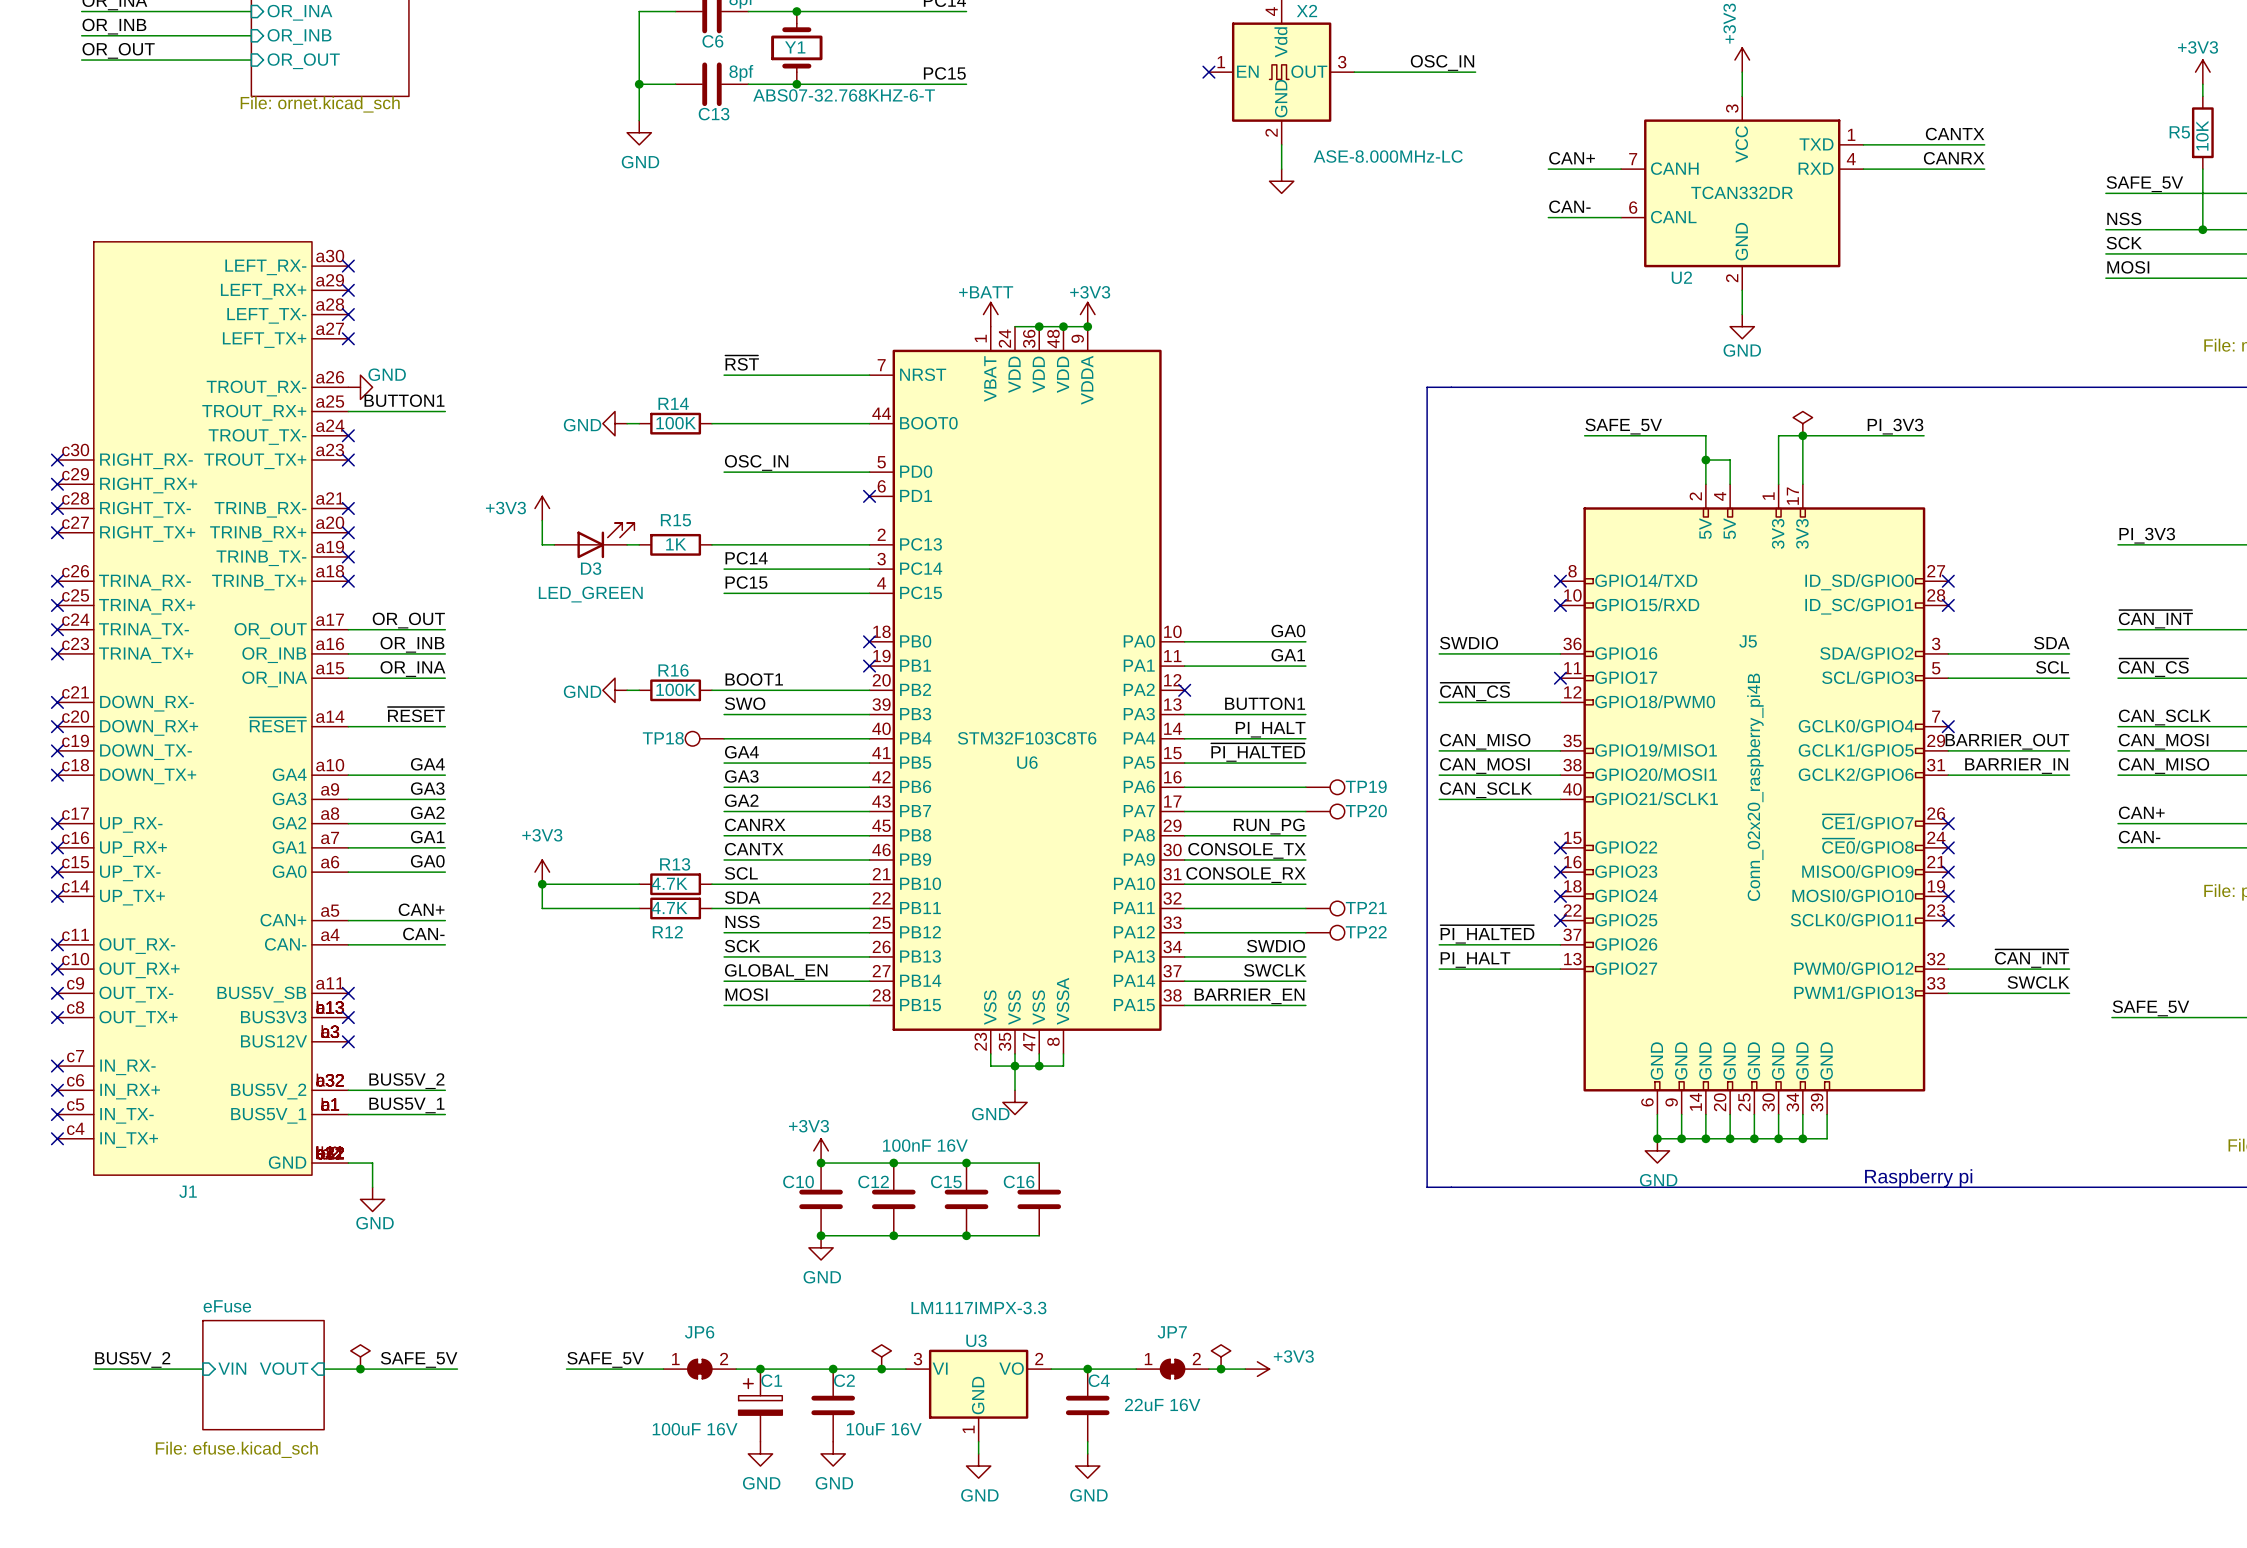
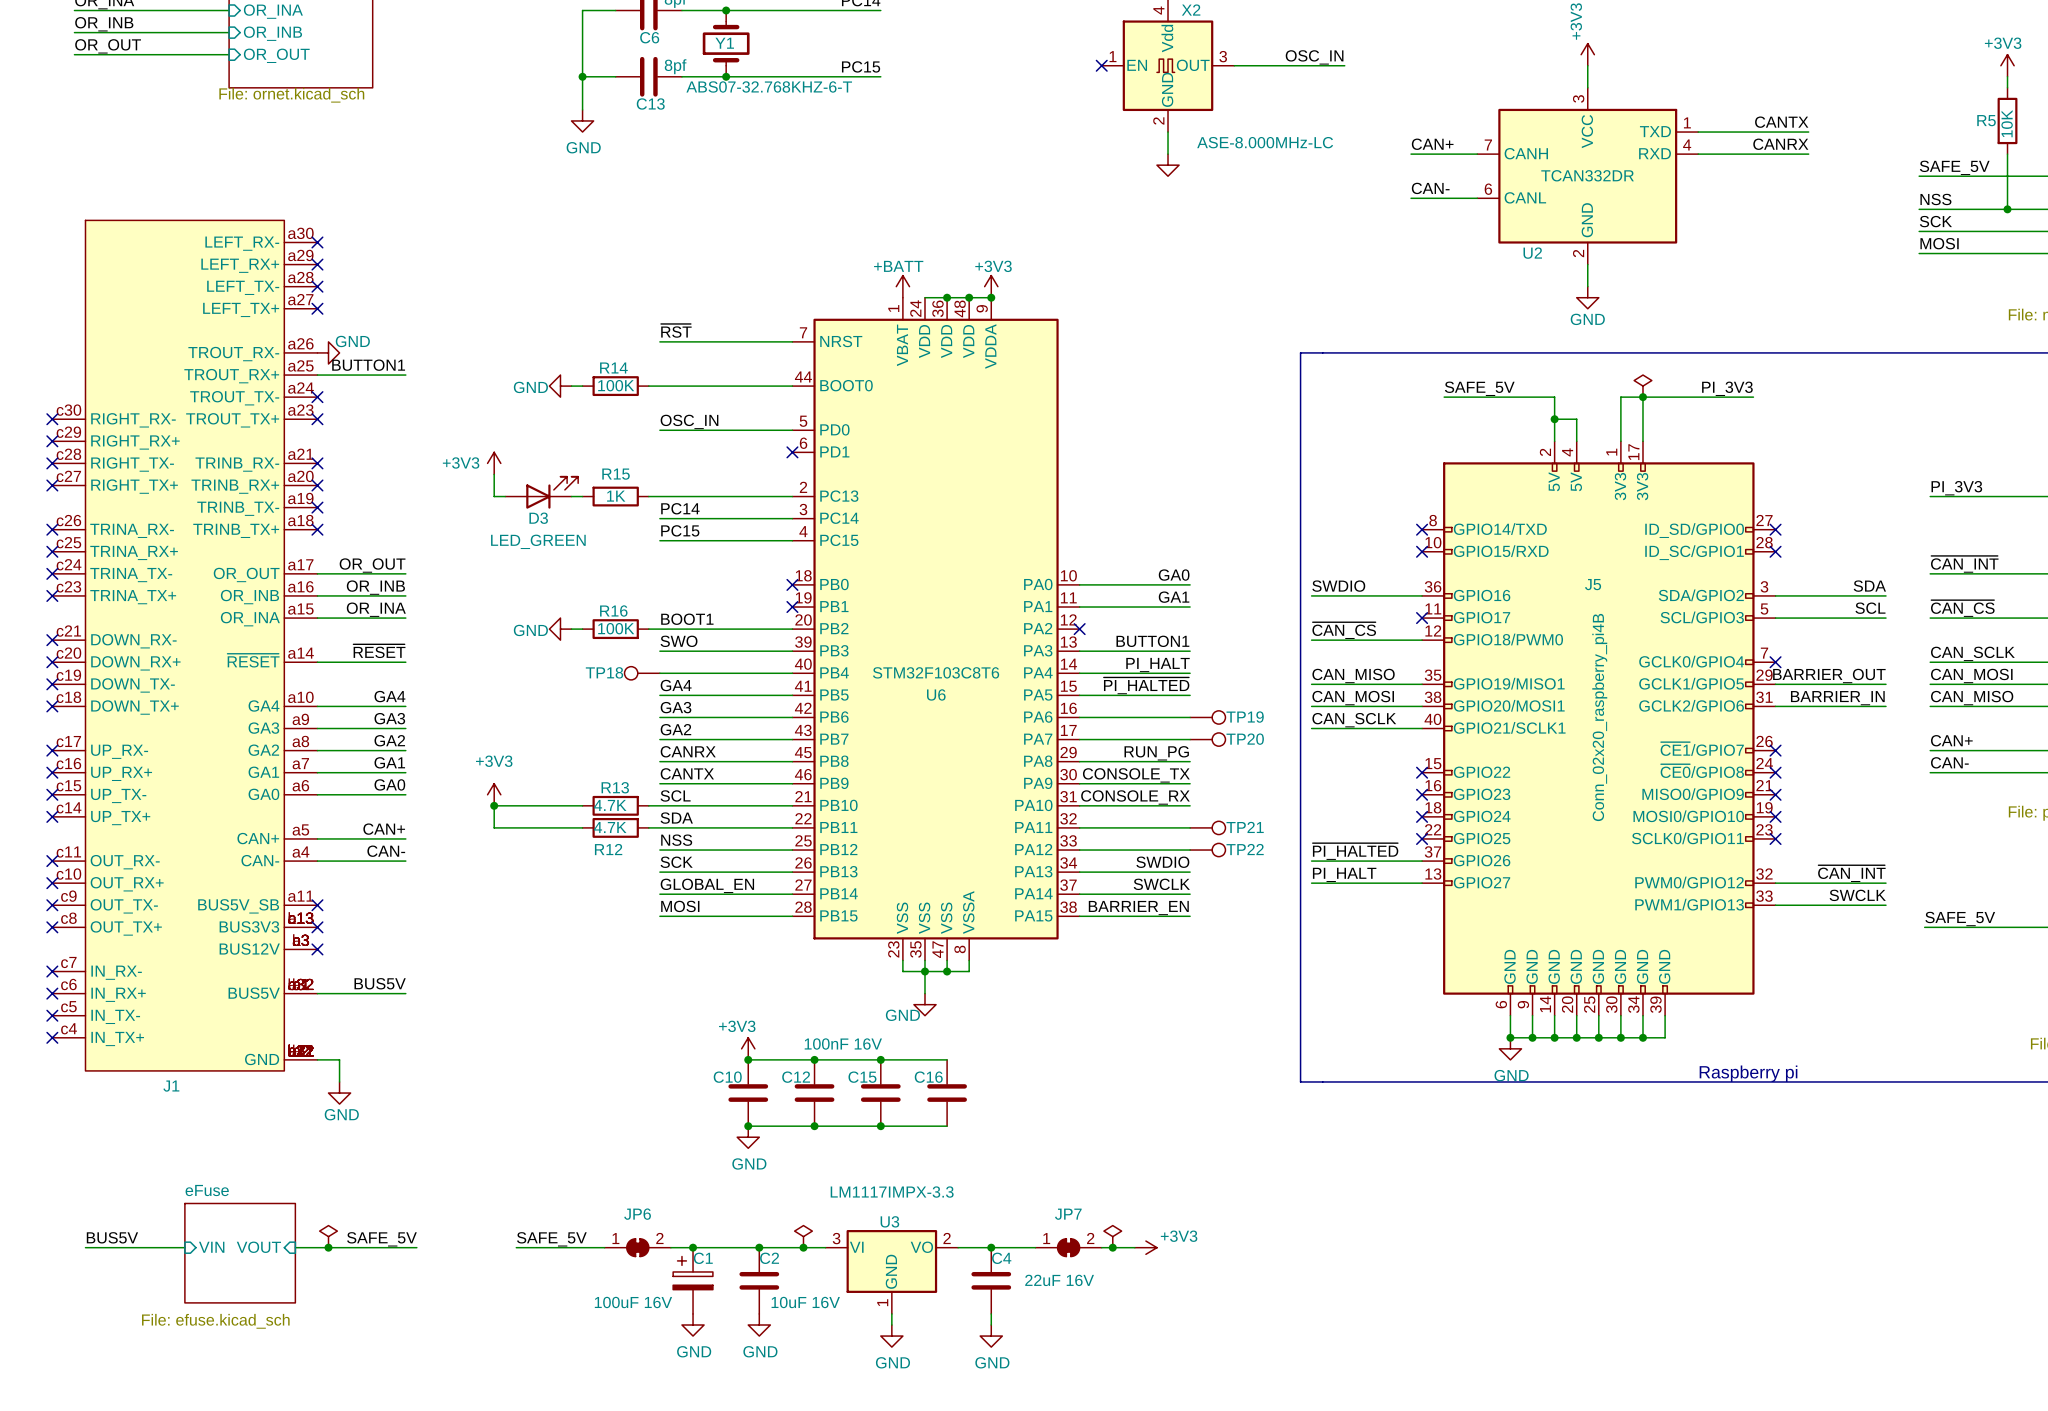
J1 symbol: [57, 241, 349, 1176] -> [52, 220, 318, 1071]
label: BUS5V_2 (406, 1081) -> BUS5V (380, 983)
label: BUS5V_1 (406, 1105) -> none
wire: (348, 1114) (445, 1114) -> none
label: BUS5V_2 (132, 1359) -> BUS5V (112, 1237)

